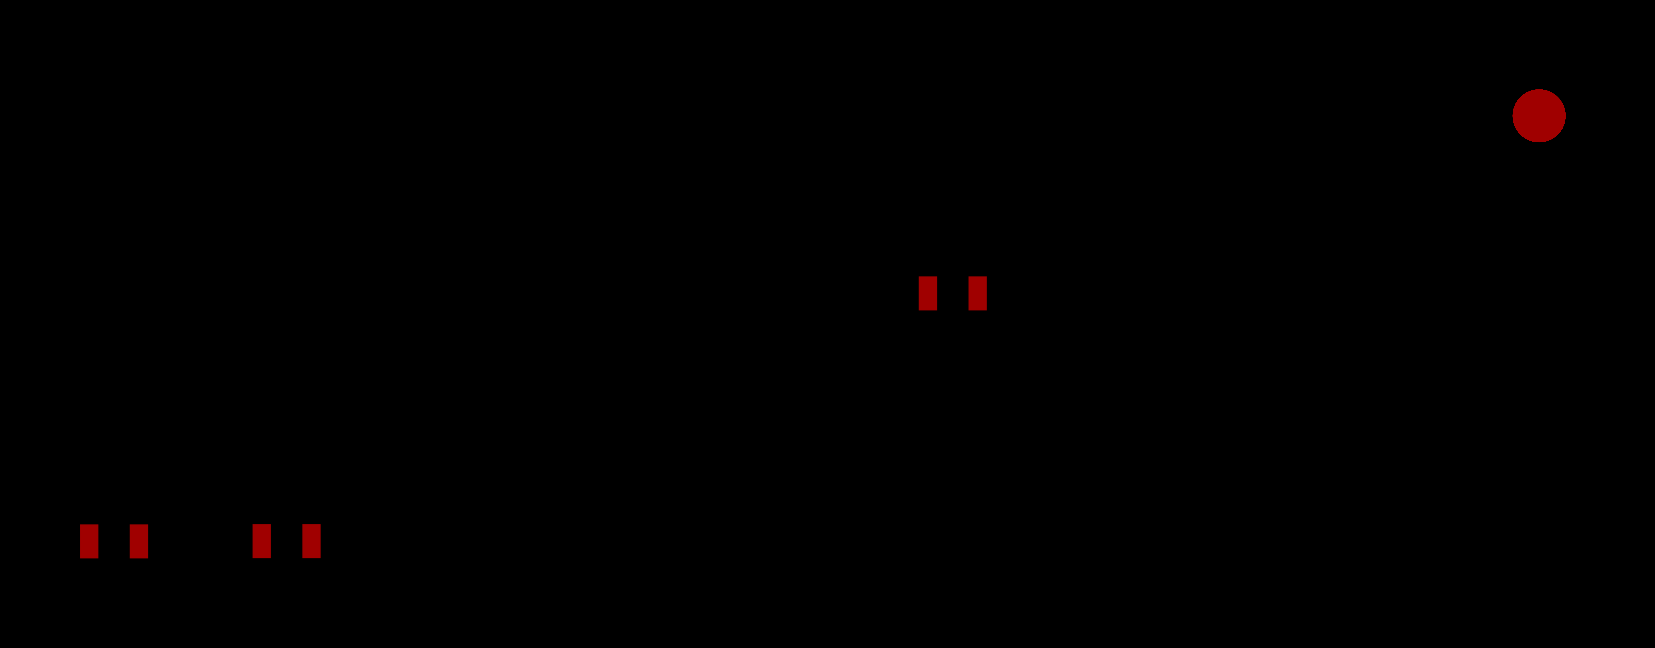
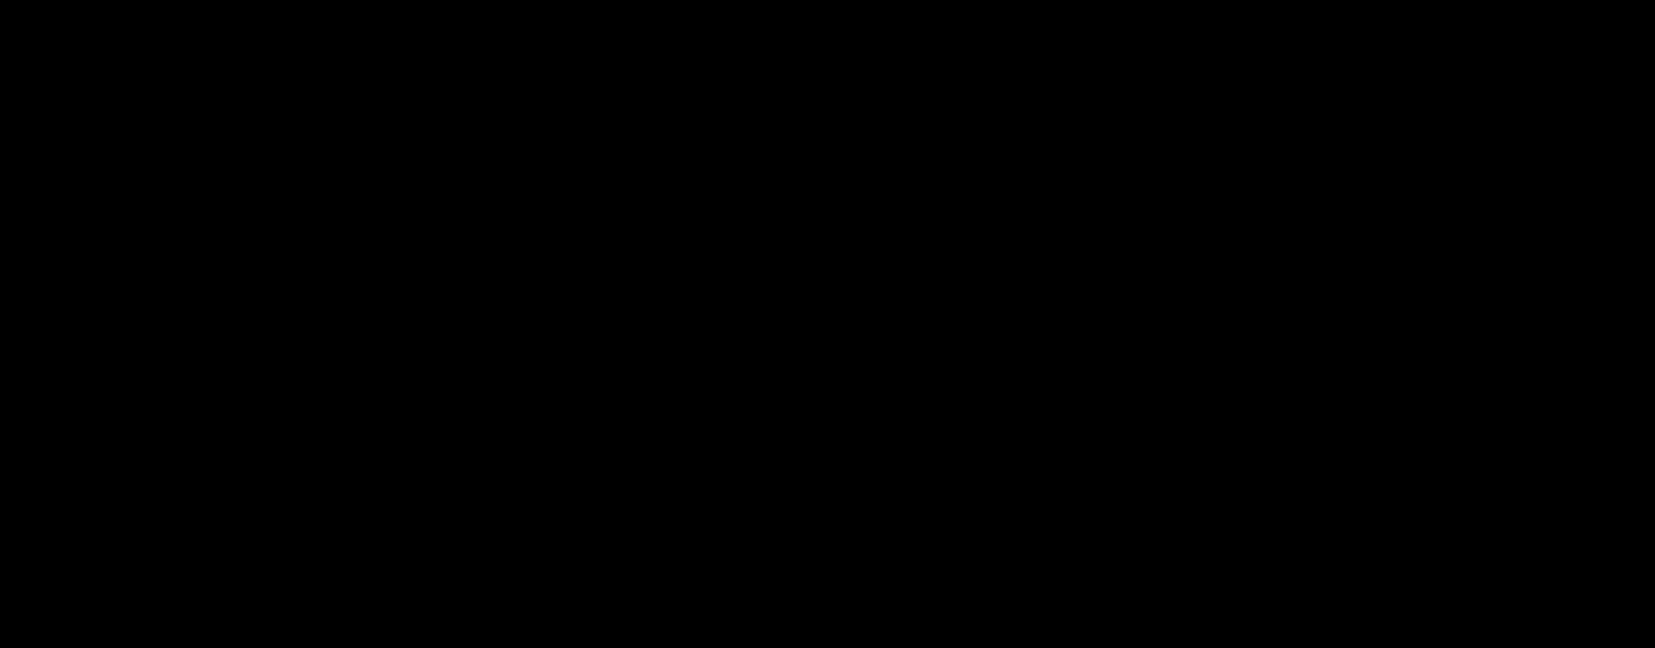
part: (1539, 115) -> none
part: (952, 293) -> none
part: (114, 541) -> none
part: (286, 541) -> none

